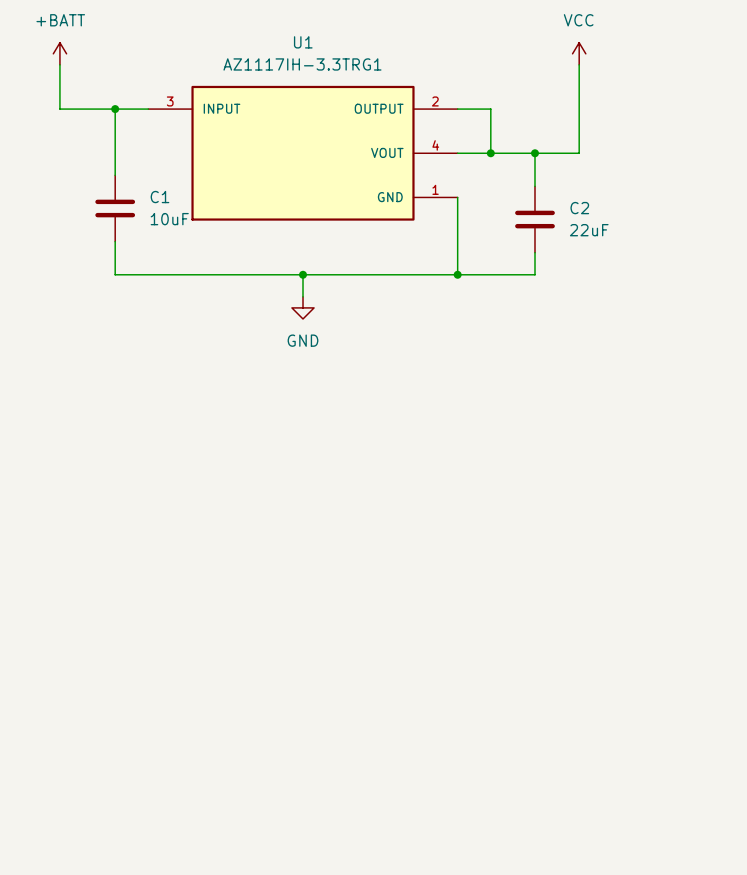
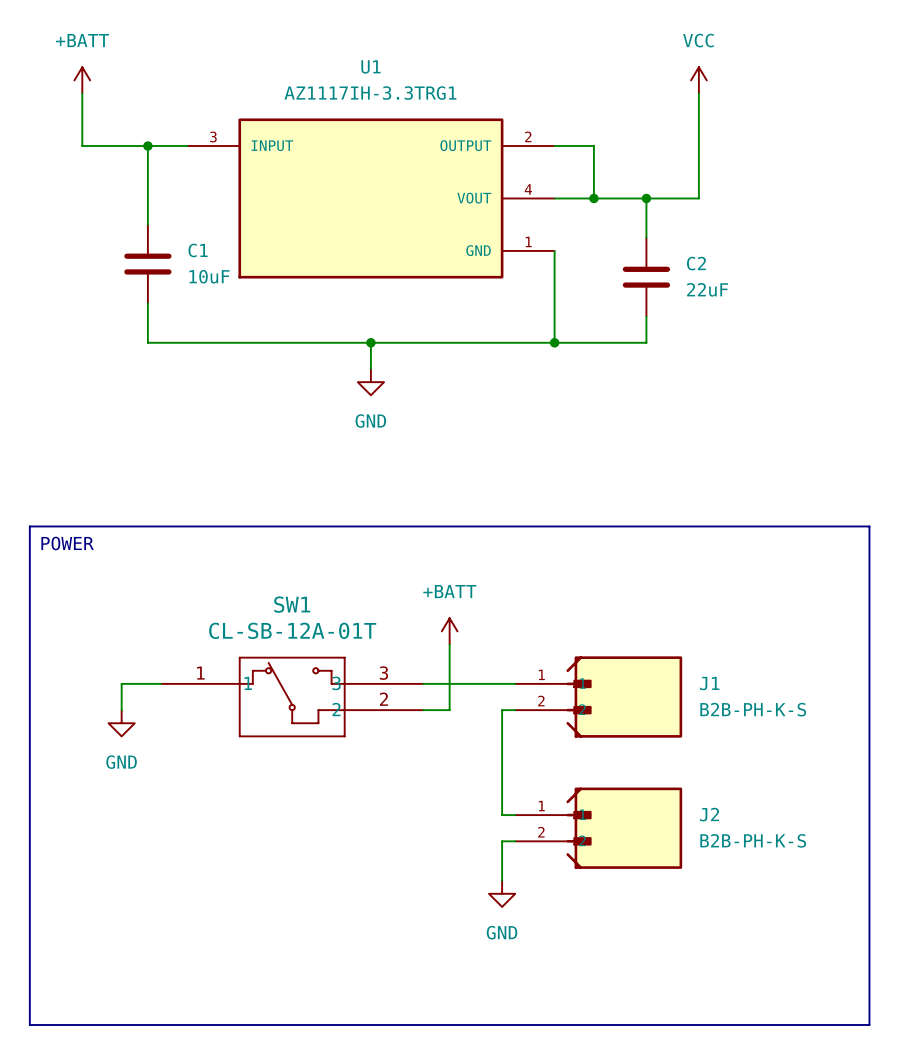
line: none -> (29, 526) (869, 526) (869, 1024) (29, 1024) (29, 526)
text: none -> POWER (67, 543)
power symbol: none -> +BATT (449, 631)
wire: none -> (449, 644) (449, 710) (423, 710)
wire: none -> (161, 683) (121, 683) (121, 710)
wire: none -> (423, 683) (515, 683)
SW1: none -> CL-SB-12A-01T (292, 697)
J1: none -> B2B-PH-K-S (598, 697)
wire: none -> (515, 710) (502, 710) (502, 815) (515, 815)
power symbol: none -> GND (121, 723)
J2: none -> B2B-PH-K-S (598, 828)
wire: none -> (515, 841) (502, 841) (502, 880)
power symbol: none -> GND (502, 893)

